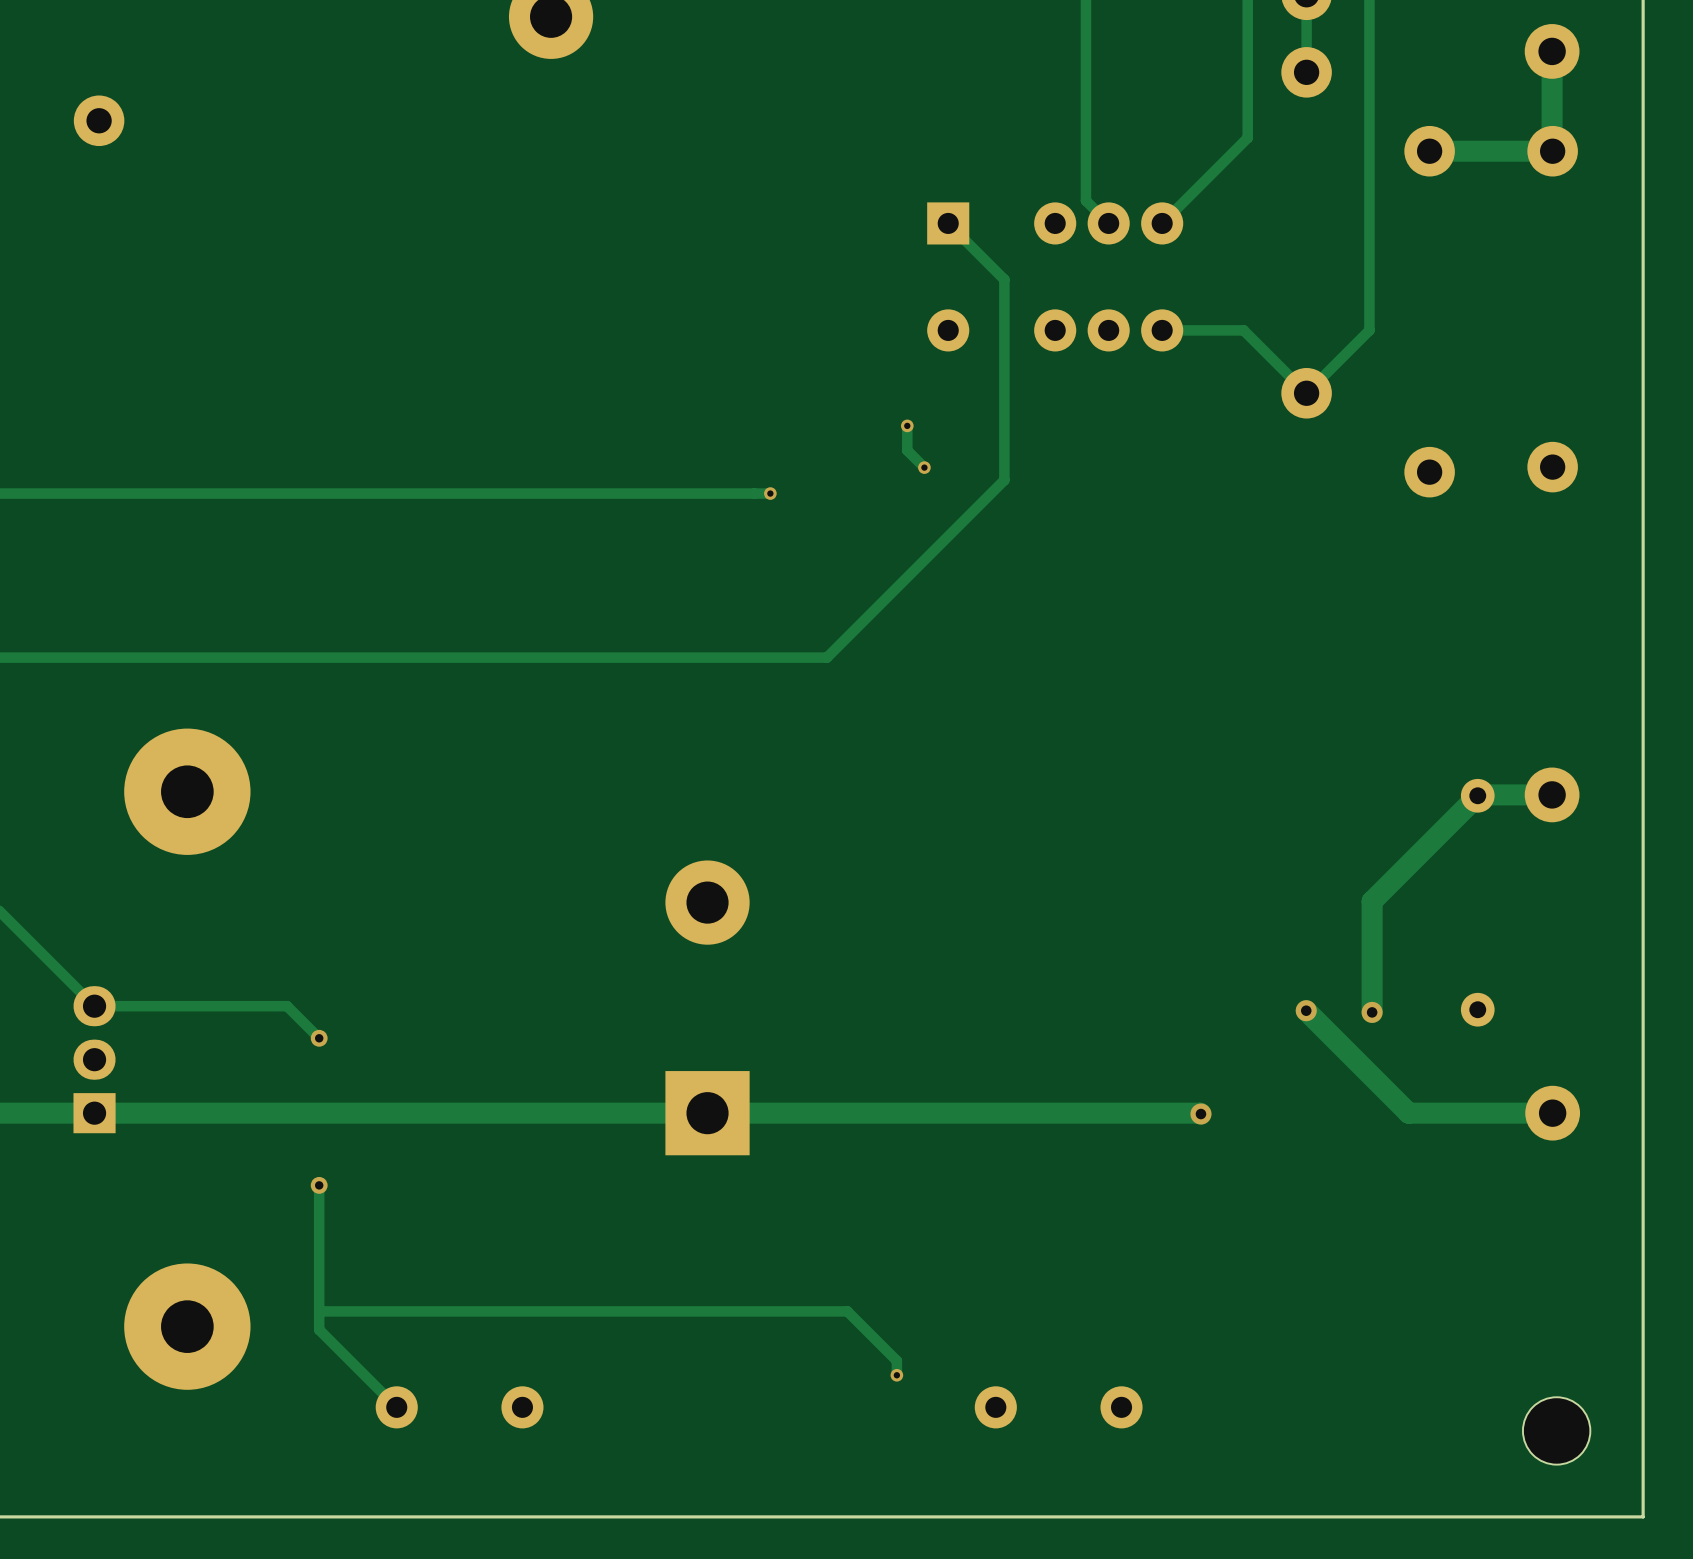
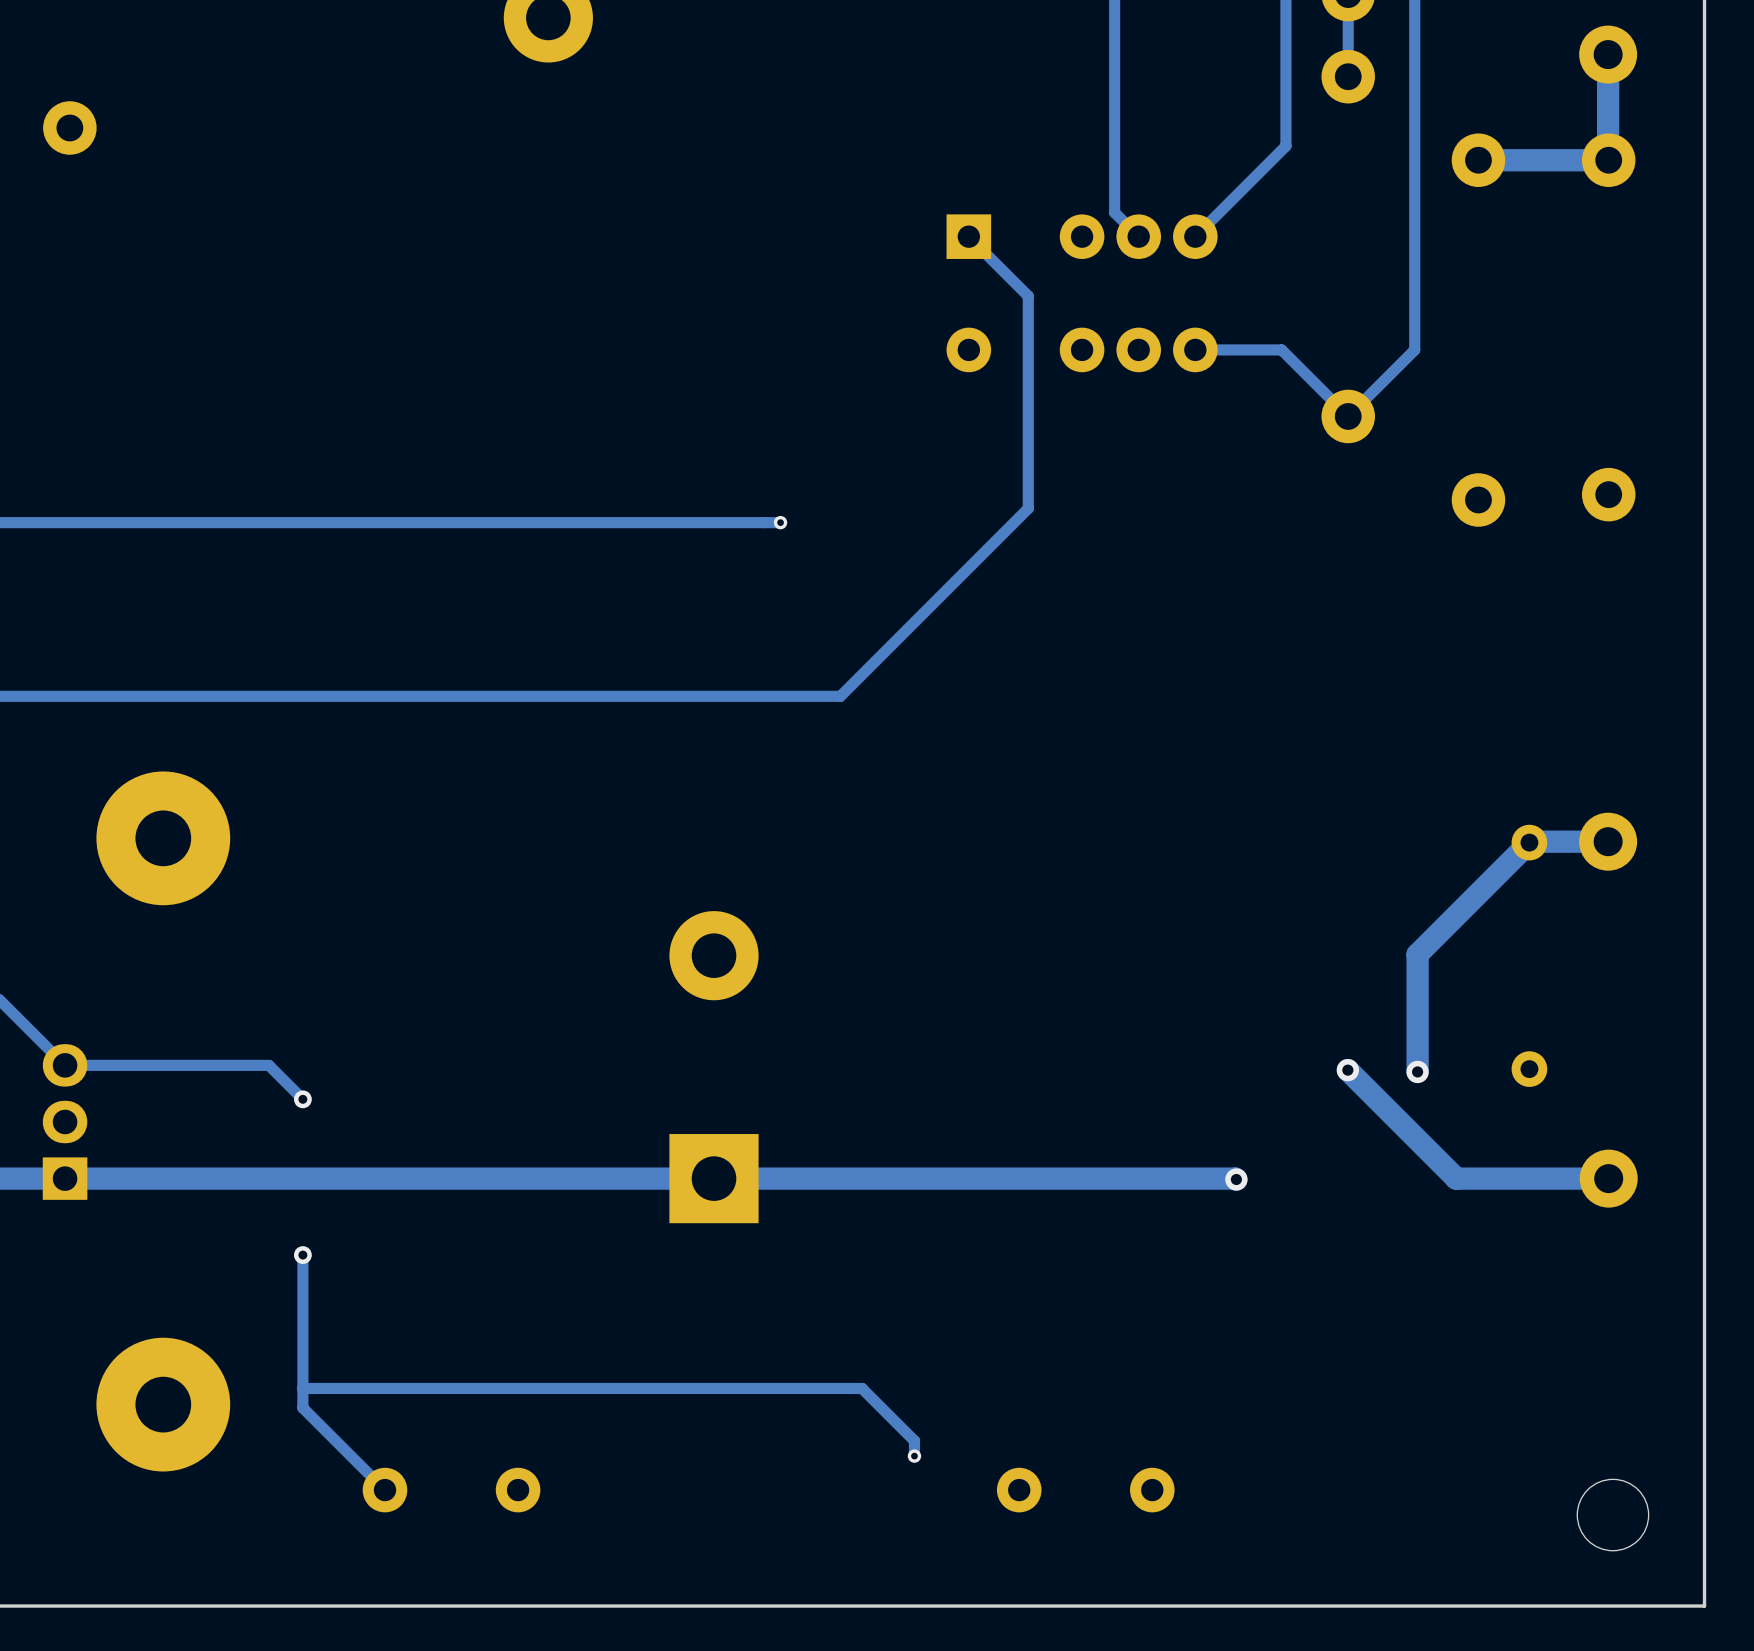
track: (907, 425) (907, 450) (924, 467) -> none
via: (907, 425) -> none
via: (924, 467) -> none

